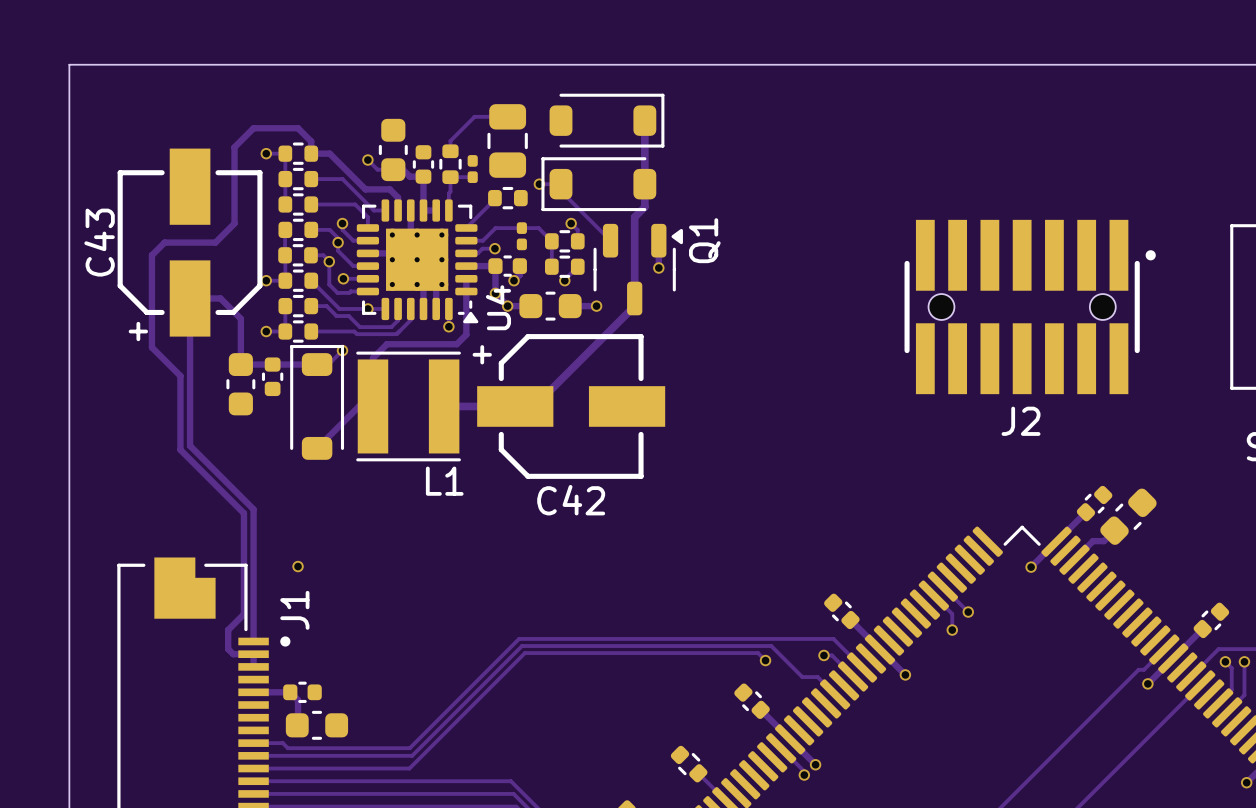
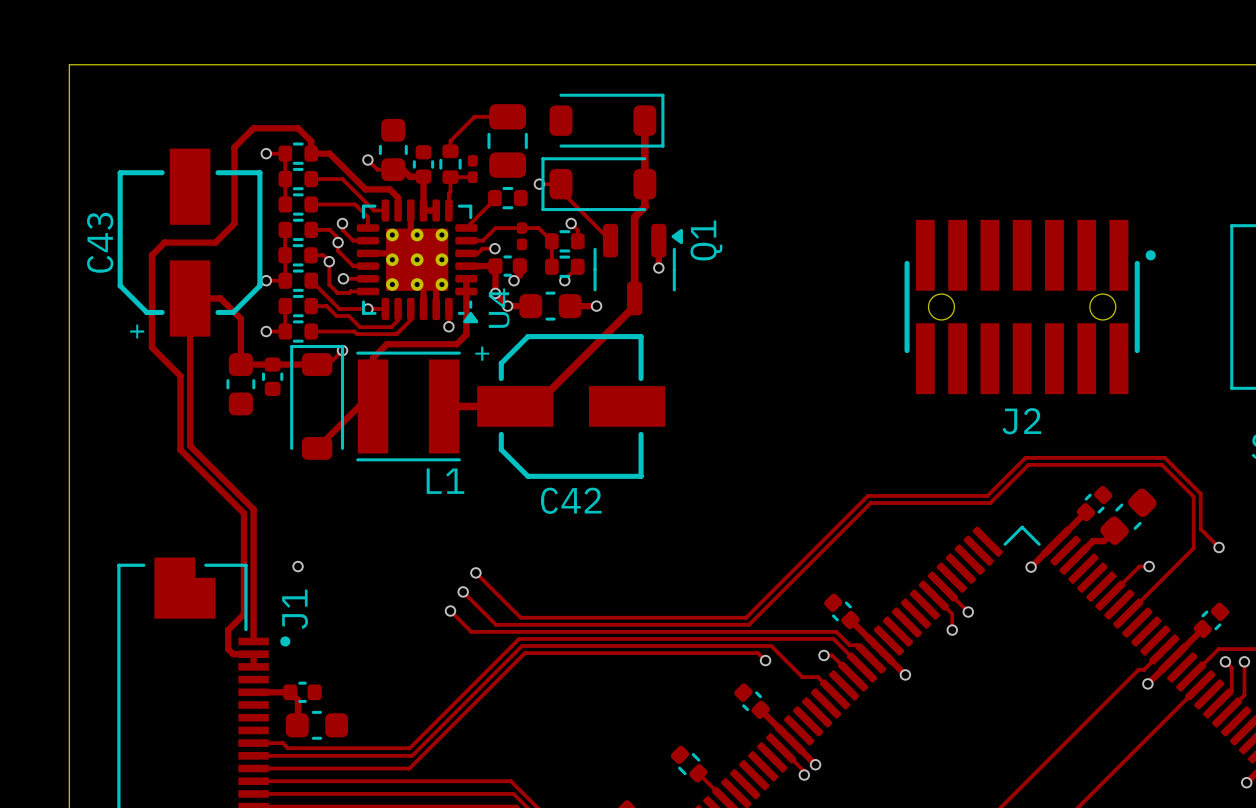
track: none -> (1219, 547) (1200, 529) (1200, 493) (1164, 457) (1025, 457) (987, 495) (867, 495) (746, 617) (520, 617) (475, 572)
via: none -> (1219, 547)
track: none -> (1149, 566) (1139, 566) (1110, 595)
via: none -> (1149, 566)
via: none -> (475, 572)
track: none -> (463, 591) (496, 624) (749, 624) (870, 503) (990, 503) (1028, 464) (1161, 464) (1193, 496) (1193, 548) (1128, 613)
via: none -> (463, 591)
track: none -> (450, 611) (471, 631) (836, 631) (849, 645) (857, 645) (871, 658)
via: none -> (450, 611)

